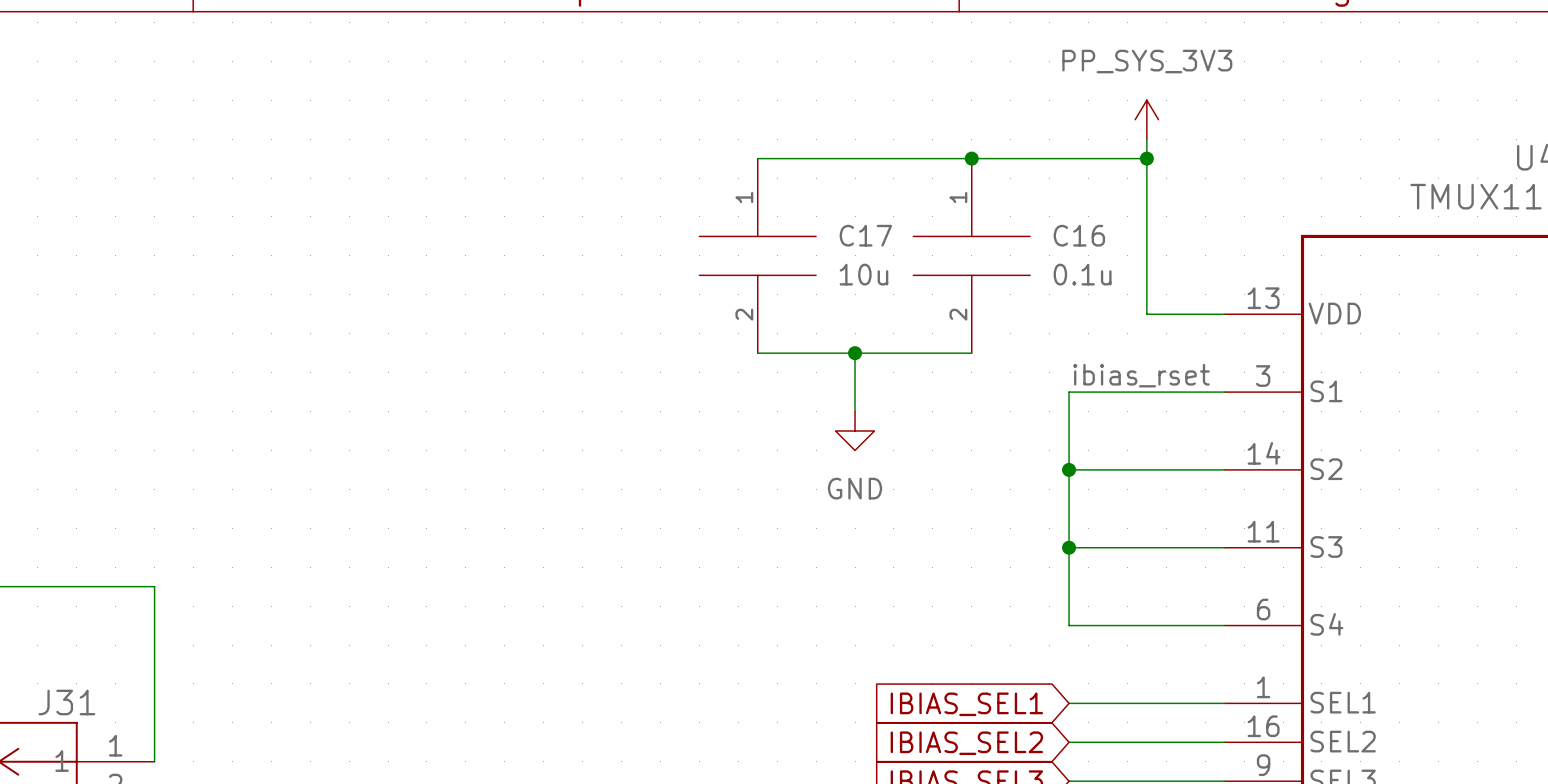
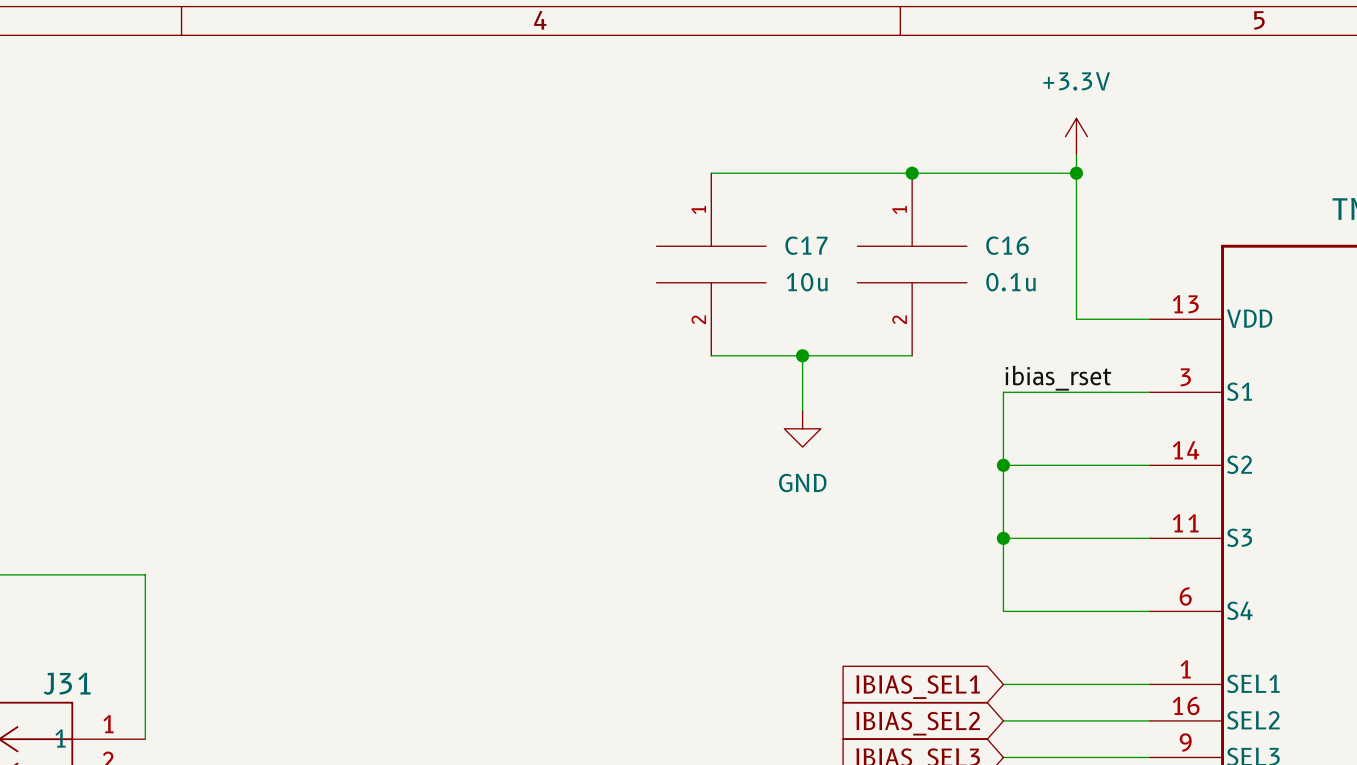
power symbol: PP_SYS_3V3 (1146, 119) -> +3.3V (1076, 136)

